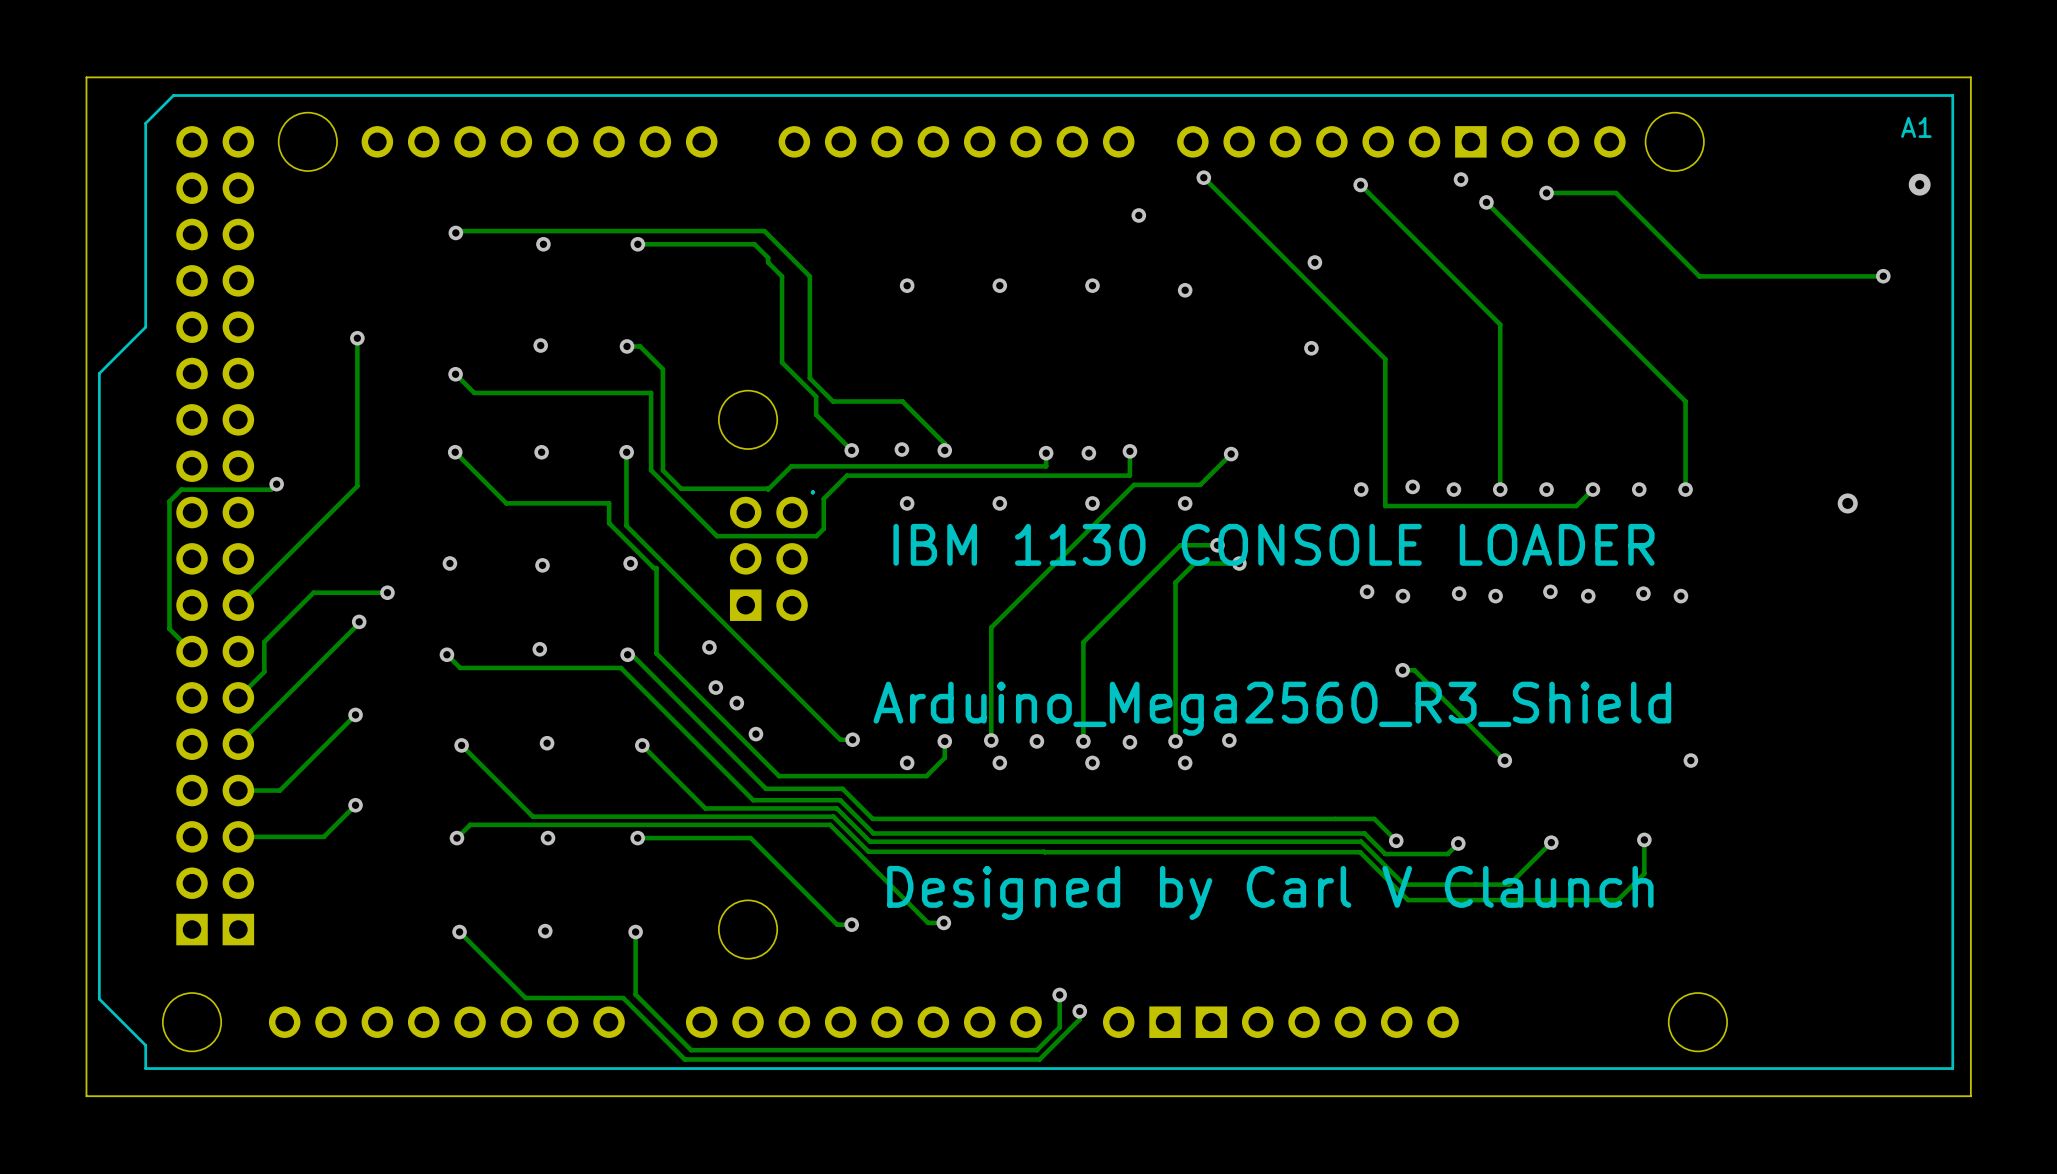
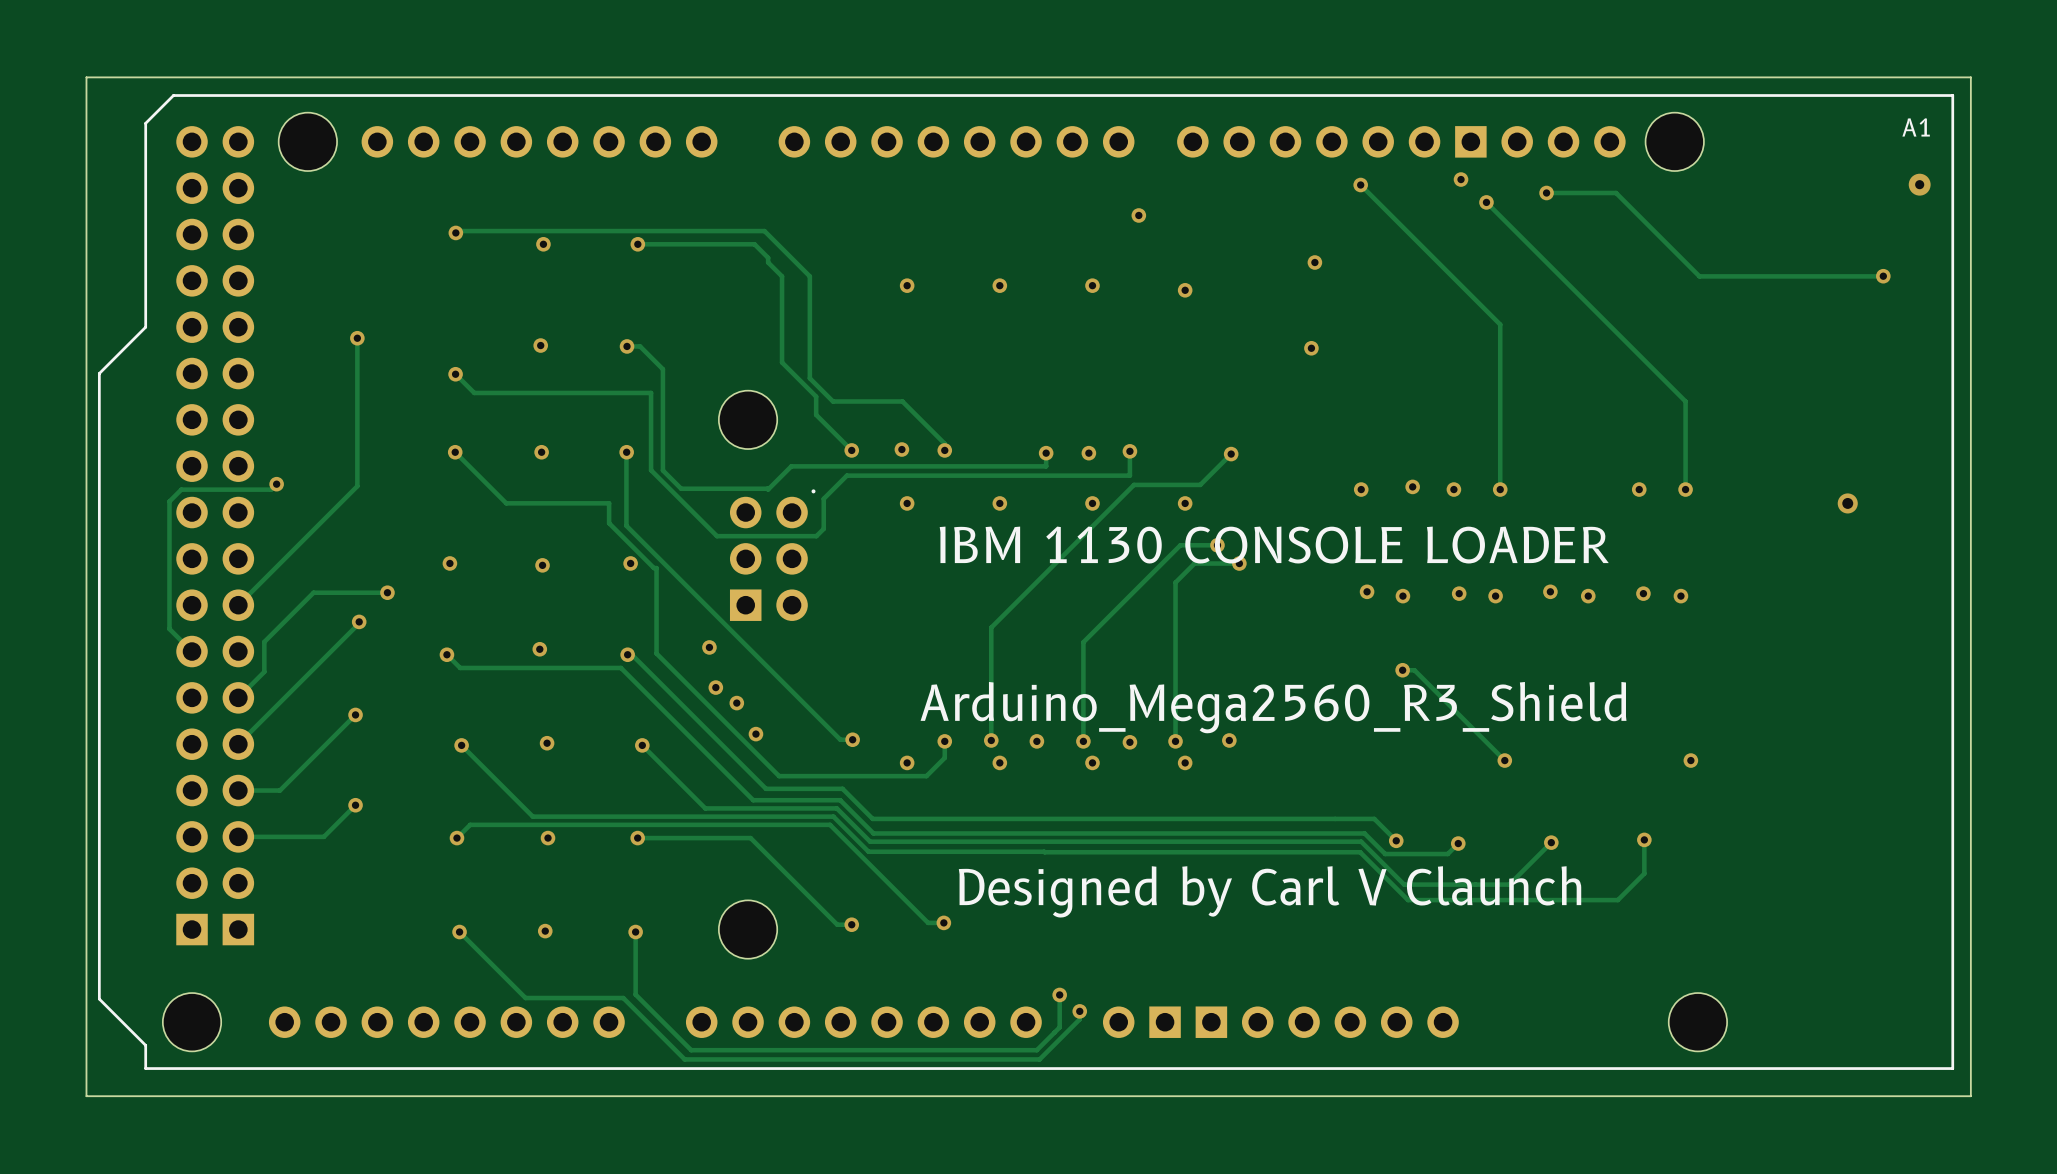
track: (1203, 177) (1385, 359) (1385, 506) (1576, 506) (1592, 489) -> none
via: (1203, 177) -> none
via: (1546, 489) -> none
via: (1592, 489) -> none

